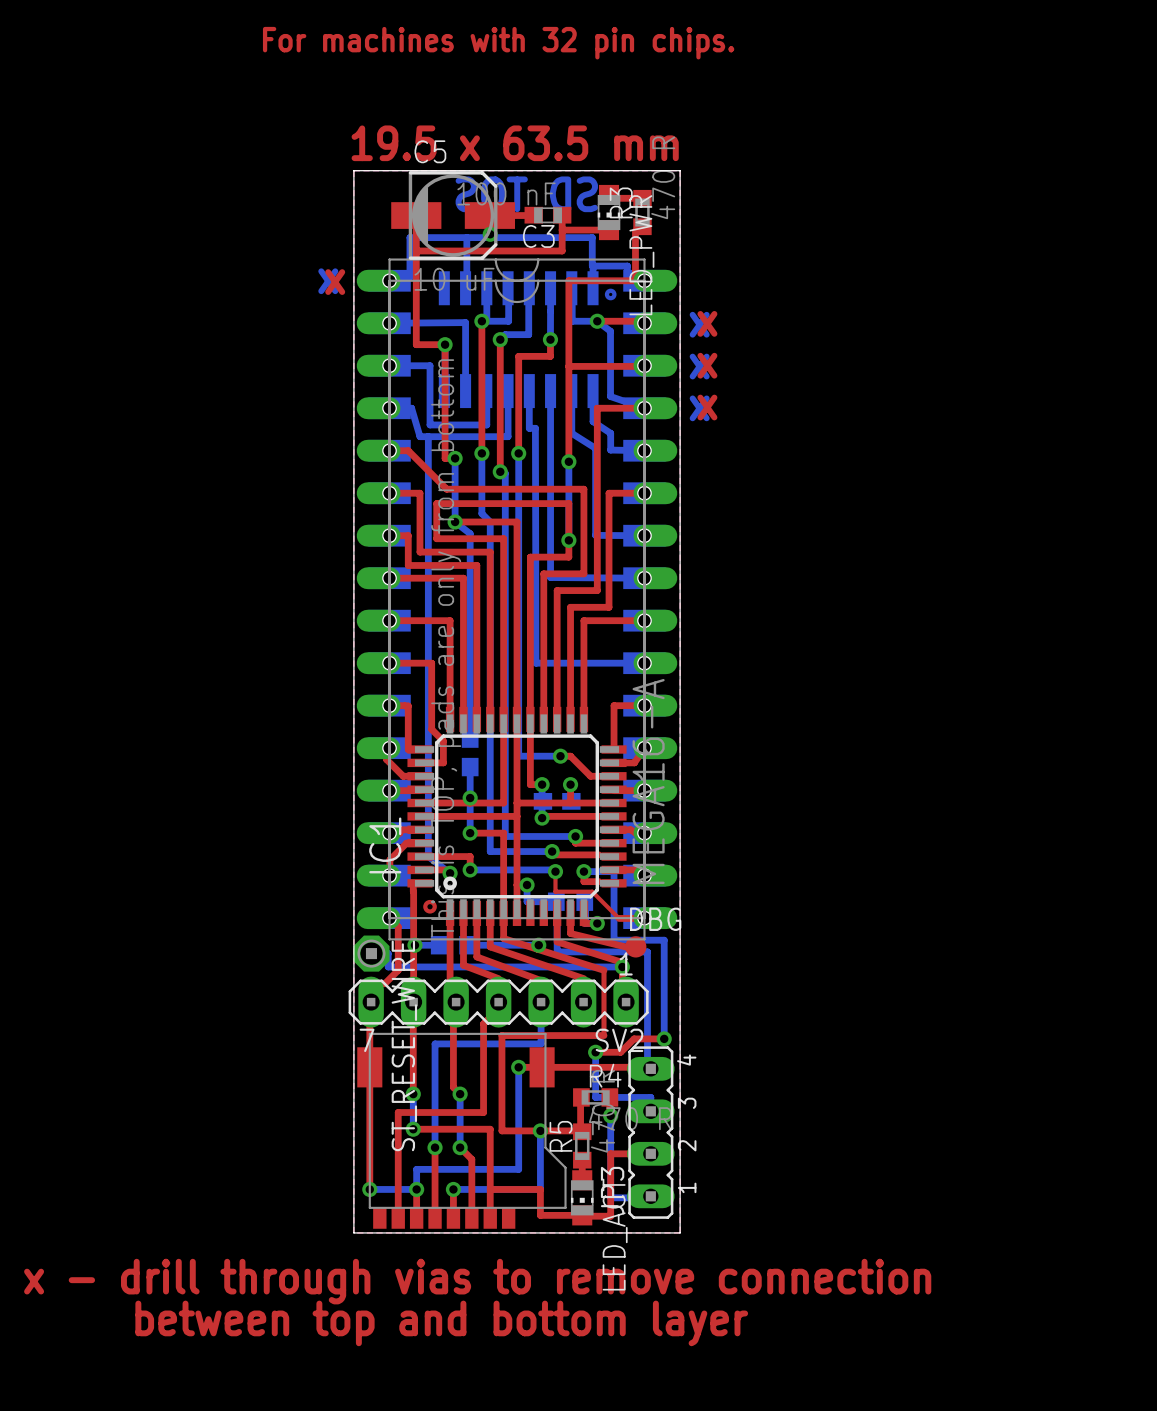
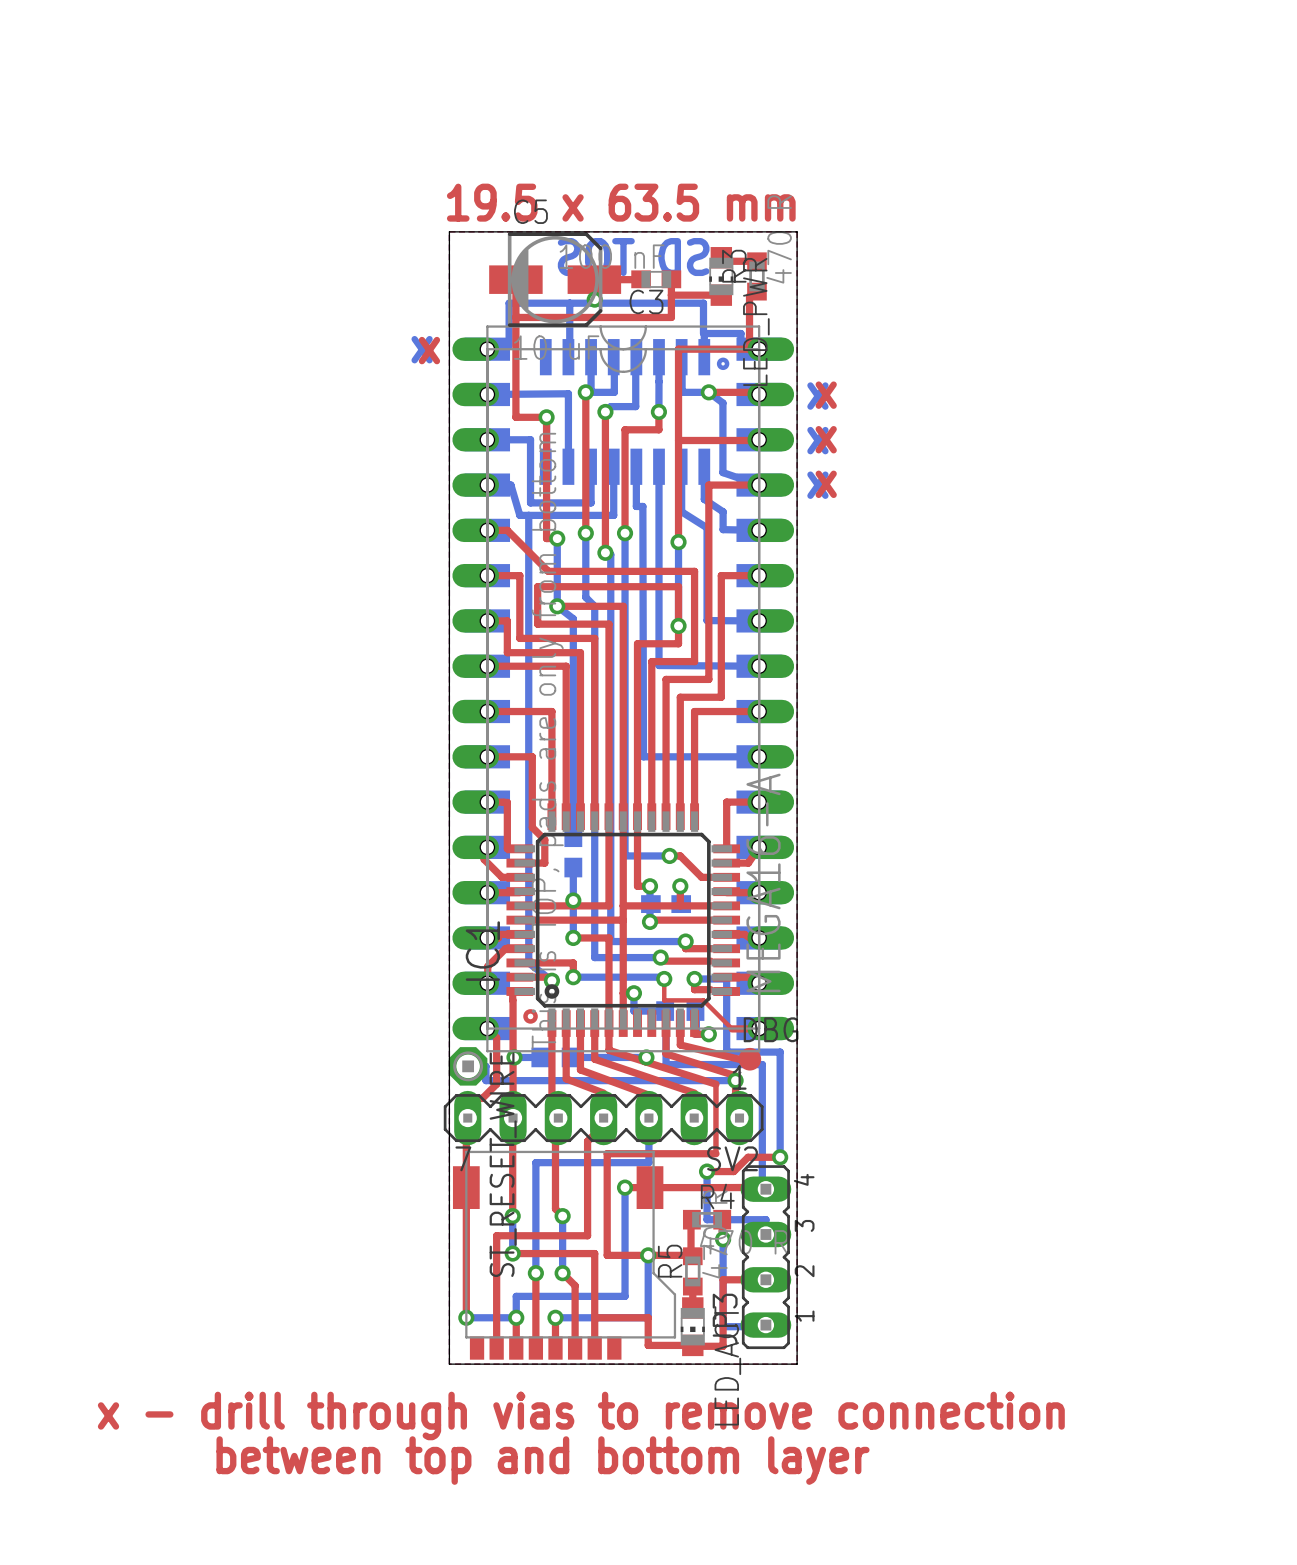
text: For machines with 32 pin chips. (498, 43) -> none

